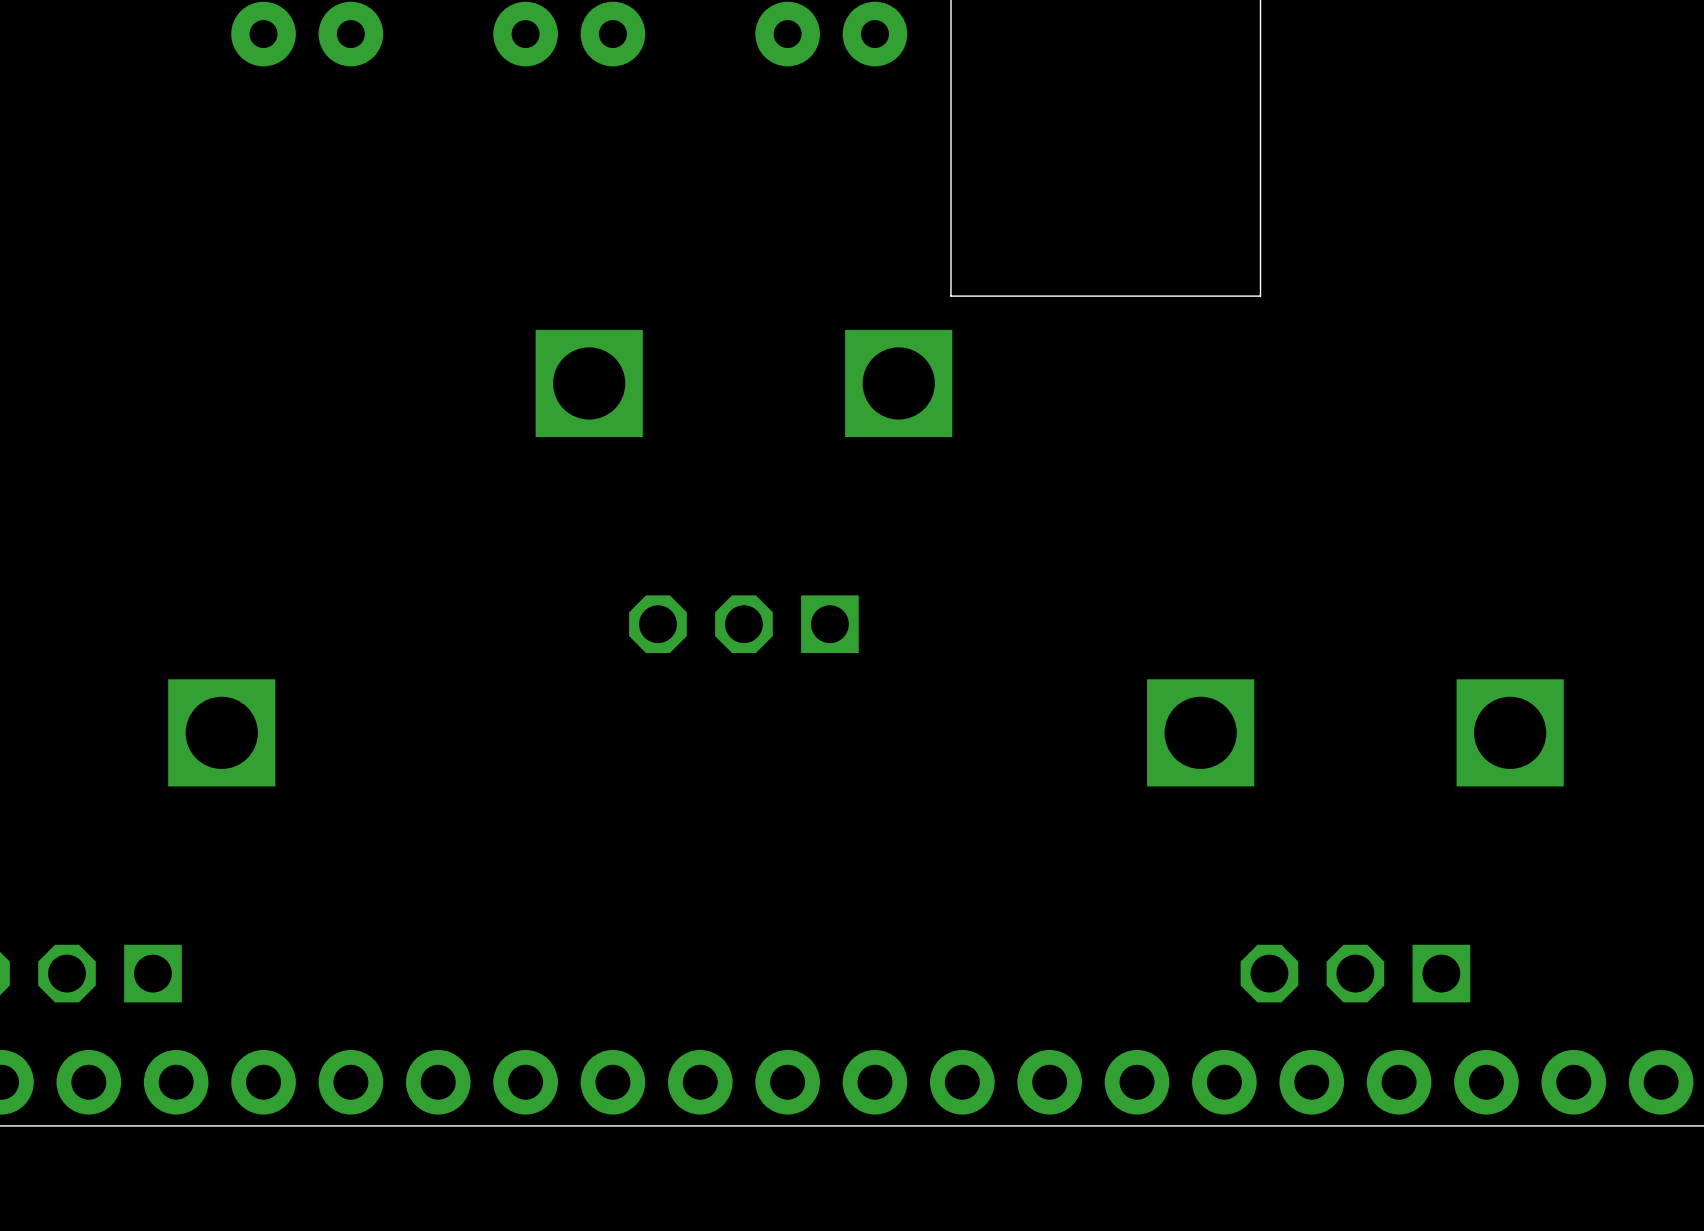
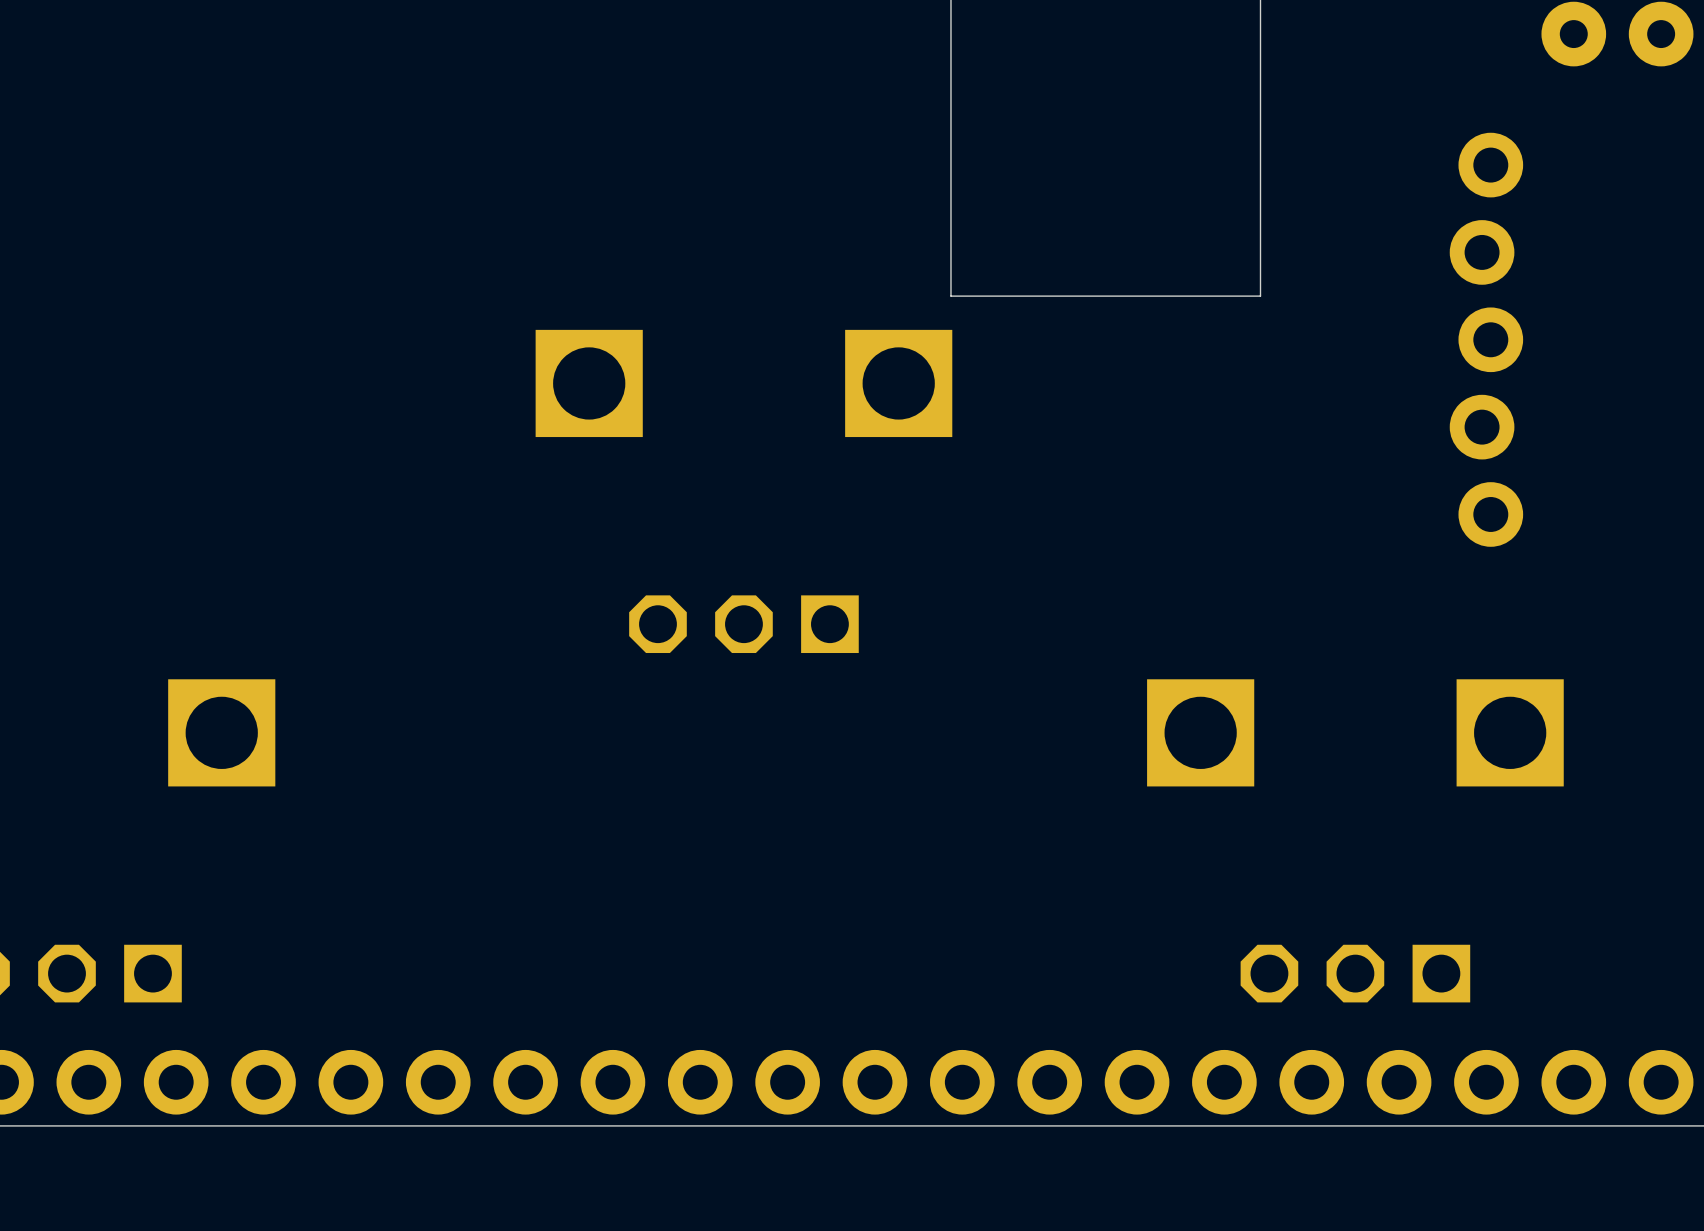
part: (307, 34) -> none
part: (569, 34) -> none
part: (831, 34) -> none
part: none -> (1617, 34)
part: none -> (1486, 339)

